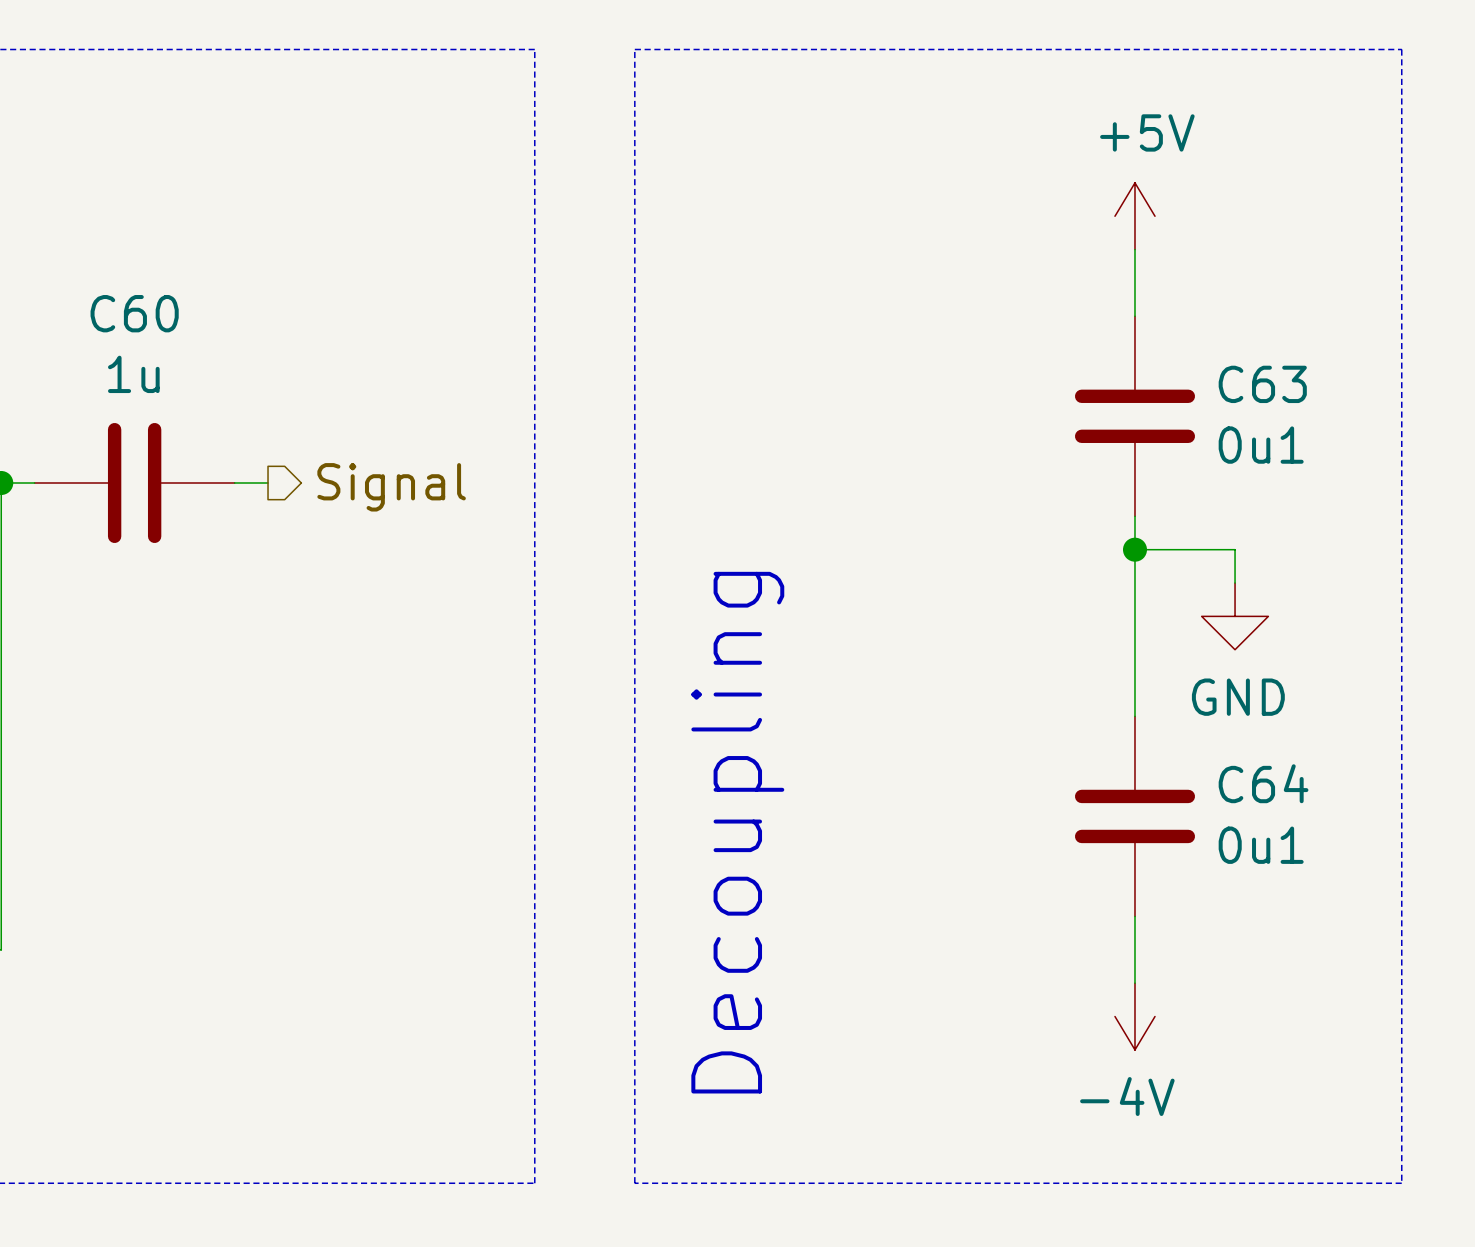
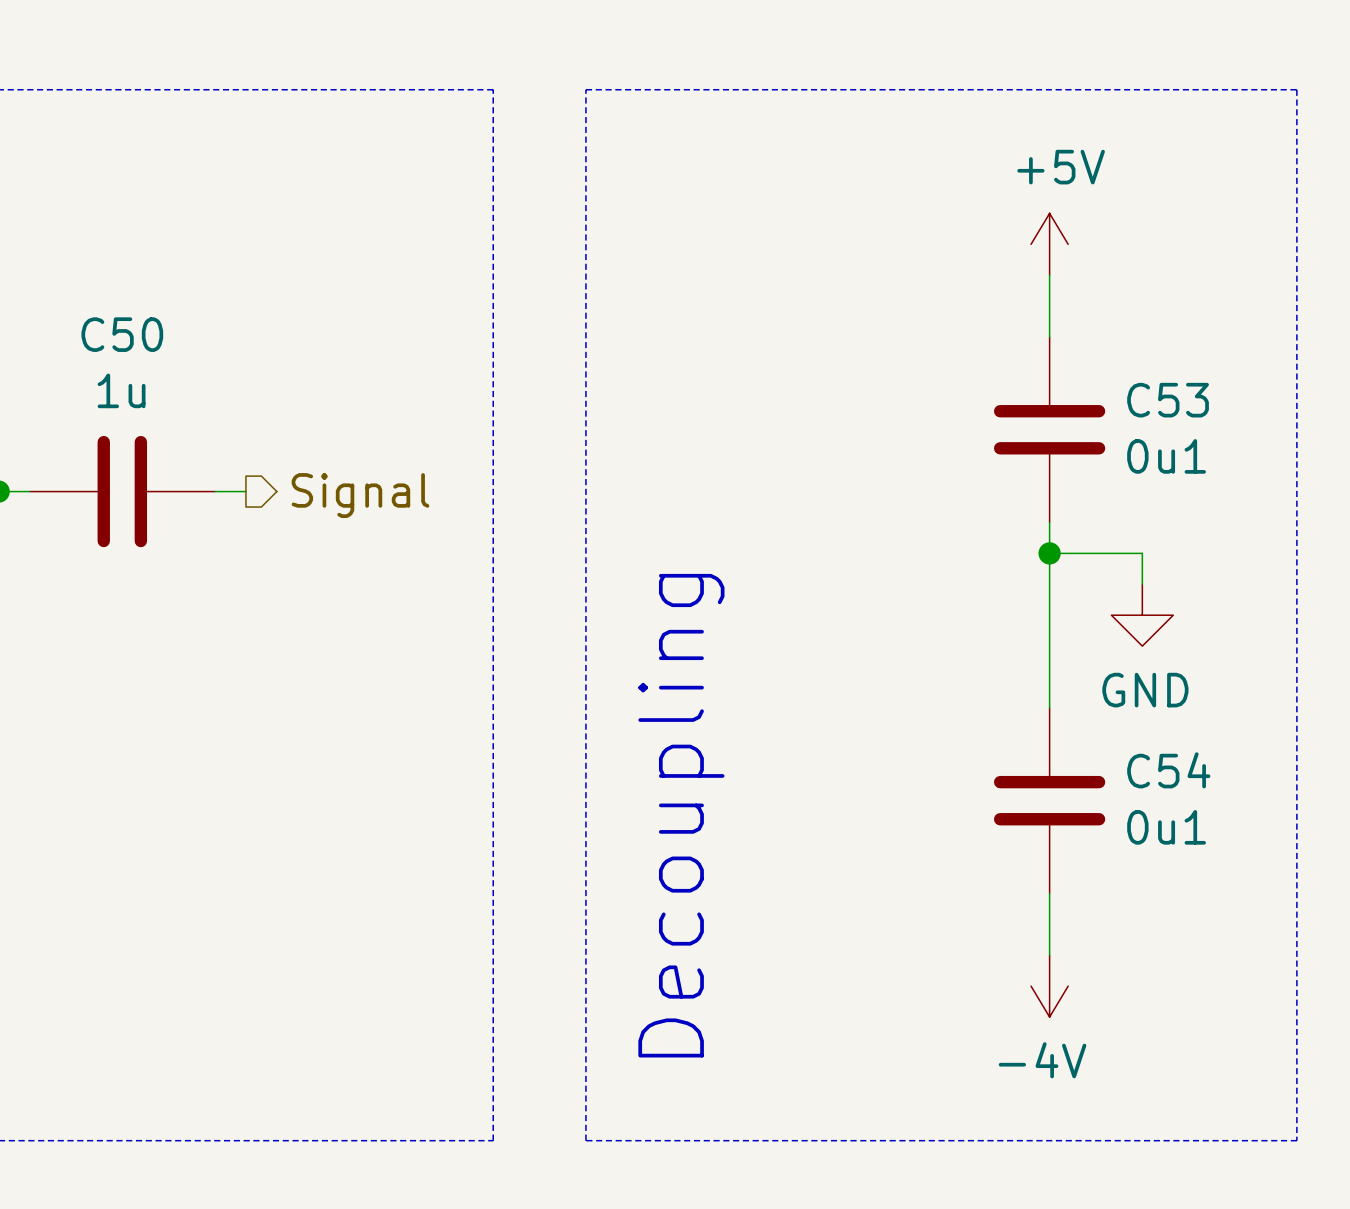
C60 name: C60 (134, 313) -> C50 (122, 334)
C63 name: C63 (1262, 384) -> C53 (1168, 400)
C64 name: C64 (1263, 783) -> C54 (1168, 770)

